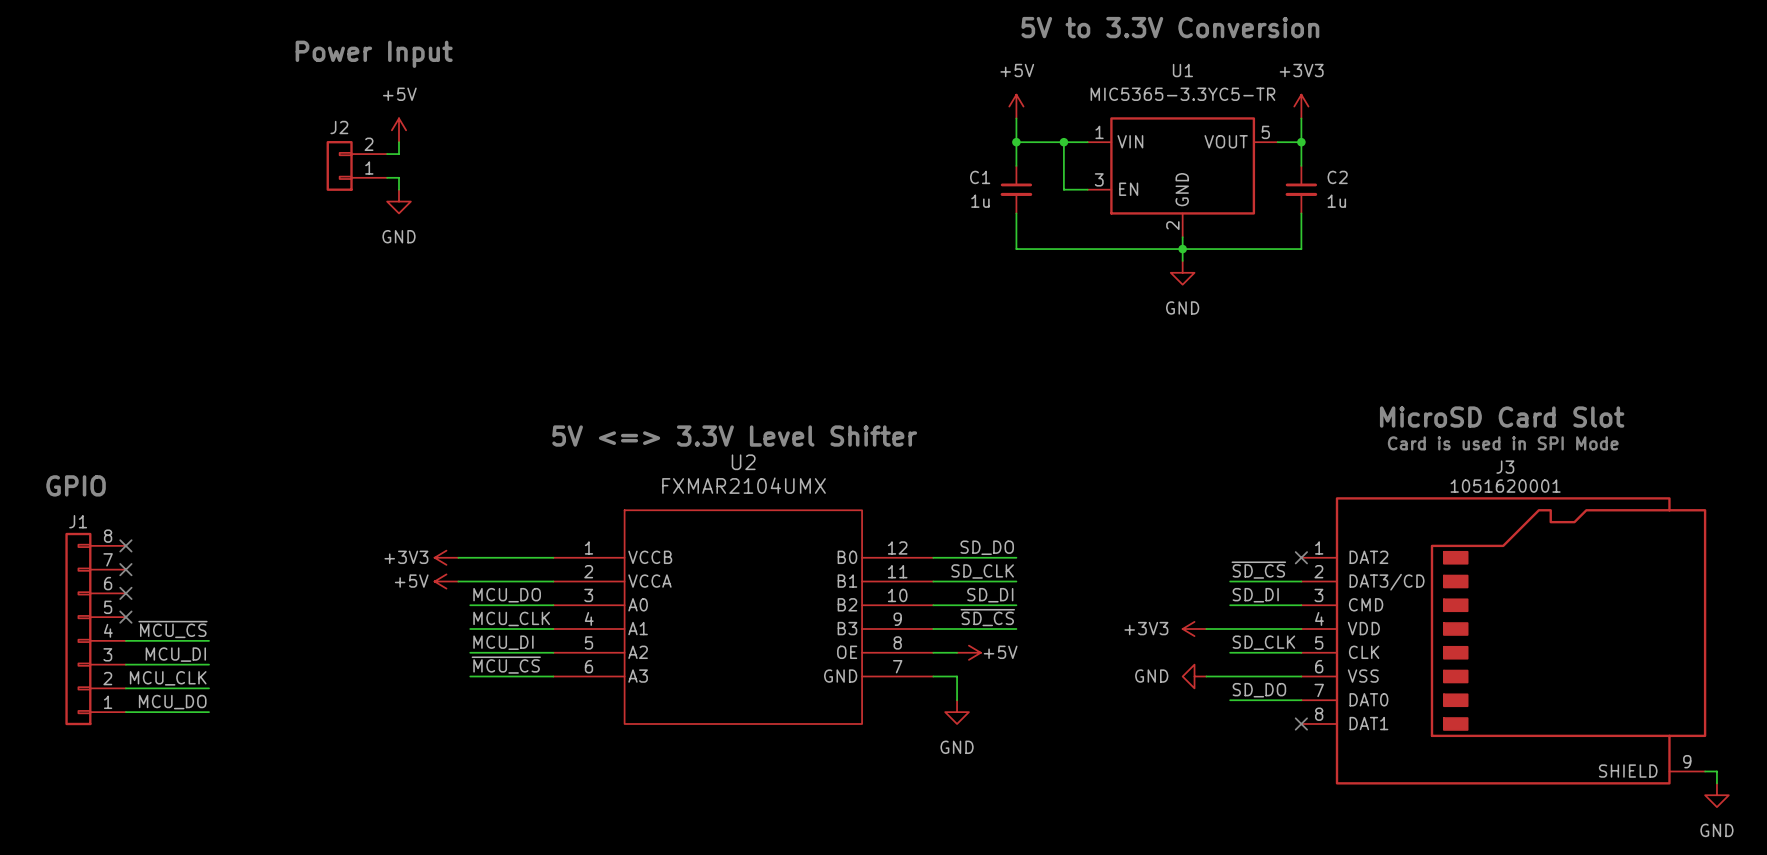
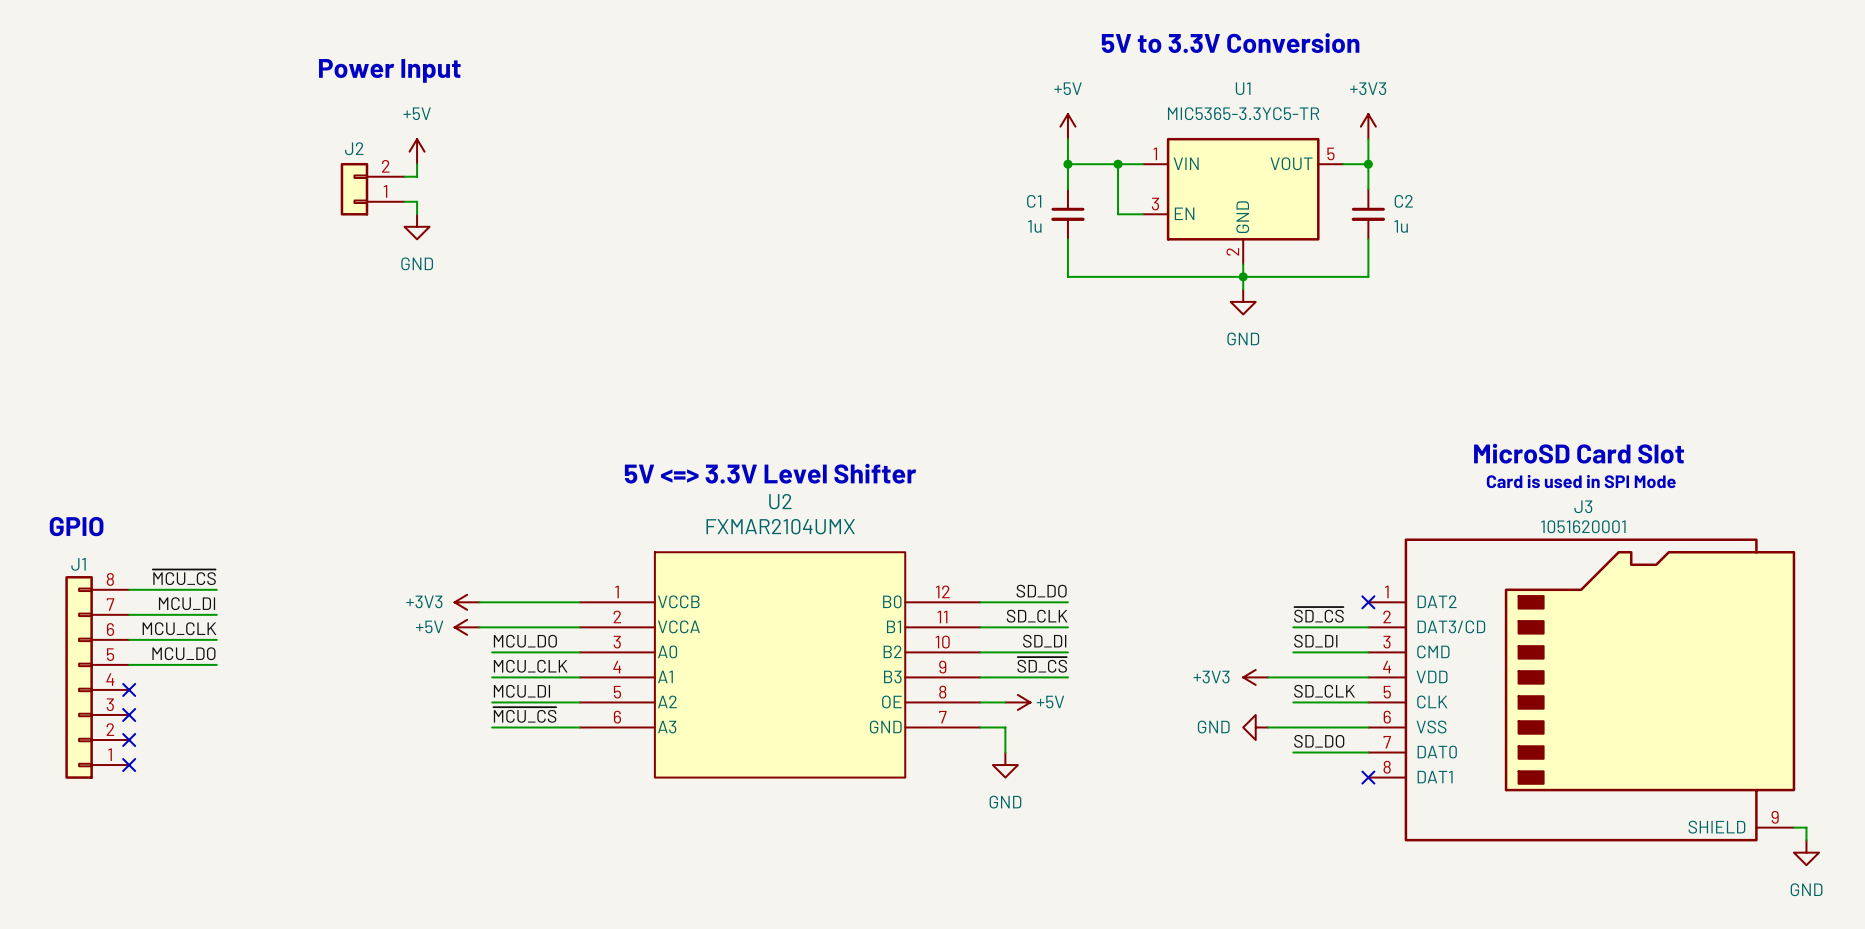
no-connect mark: (125, 545) -> none
no-connect mark: (125, 569) -> none
no-connect mark: (125, 593) -> none
no-connect mark: (125, 617) -> none
label position: ~{MCU_CS} (172, 629) -> ~{MCU_CS} (184, 577)
wire: (125, 640) (209, 640) -> (129, 589) (216, 589)
no-connect mark: none -> (129, 689)
label position: MCU_DI (175, 654) -> MCU_DI (187, 603)
wire: (125, 664) (209, 664) -> (129, 614) (216, 614)
no-connect mark: none -> (129, 714)
label position: MCU_CLK (168, 678) -> MCU_CLK (179, 628)
wire: (125, 688) (209, 688) -> (129, 639) (216, 639)
no-connect mark: none -> (129, 740)
label position: MCU_DO (172, 702) -> MCU_DO (183, 653)
wire: (125, 712) (209, 712) -> (129, 664) (216, 664)
no-connect mark: none -> (129, 765)

